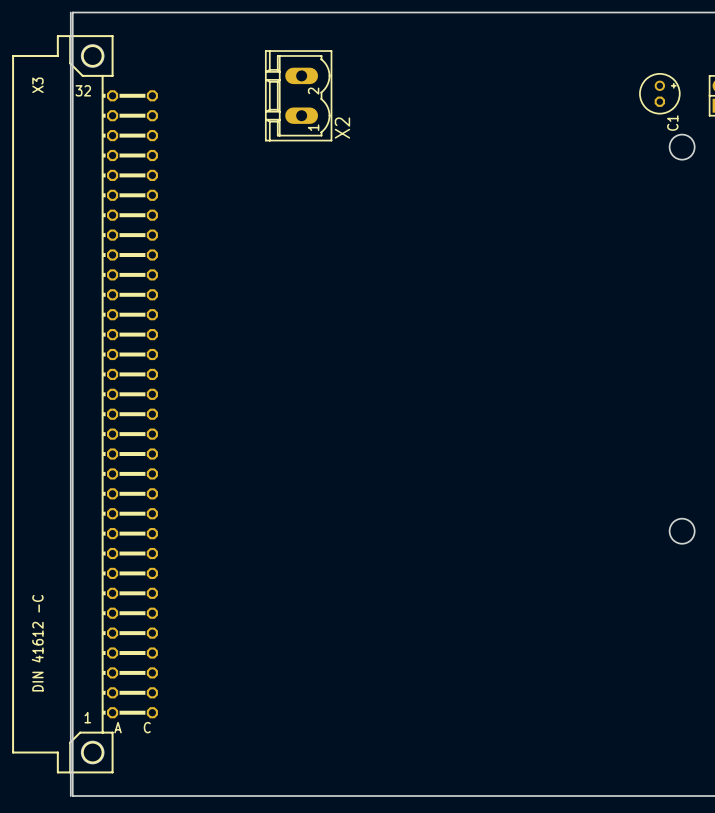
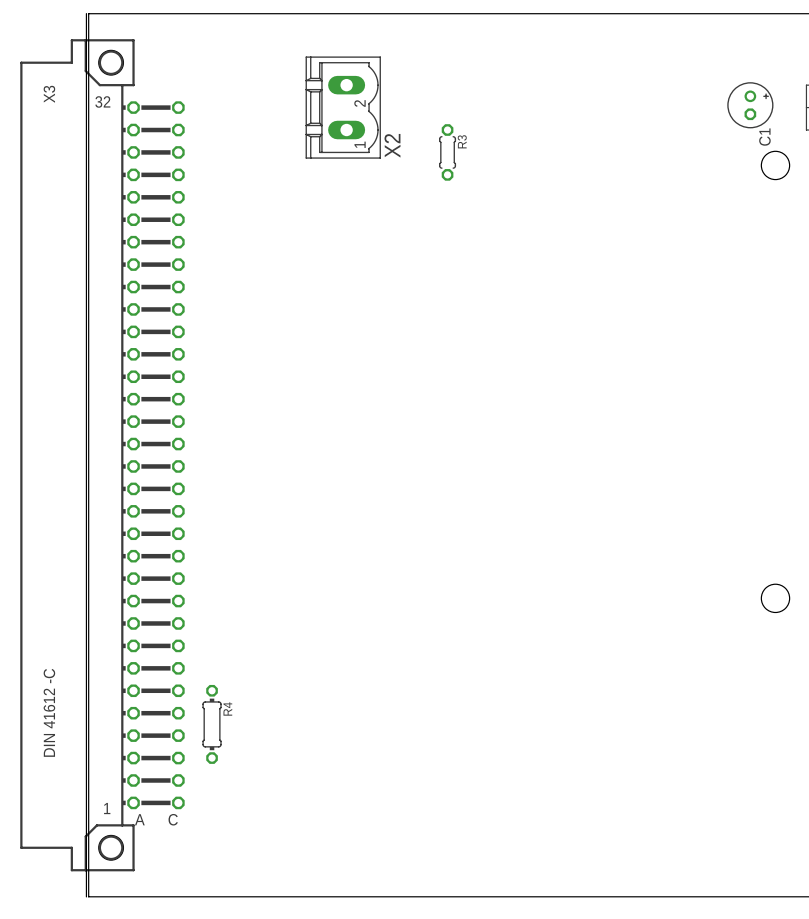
R3: none -> (447, 152)
R4: none -> (212, 724)

